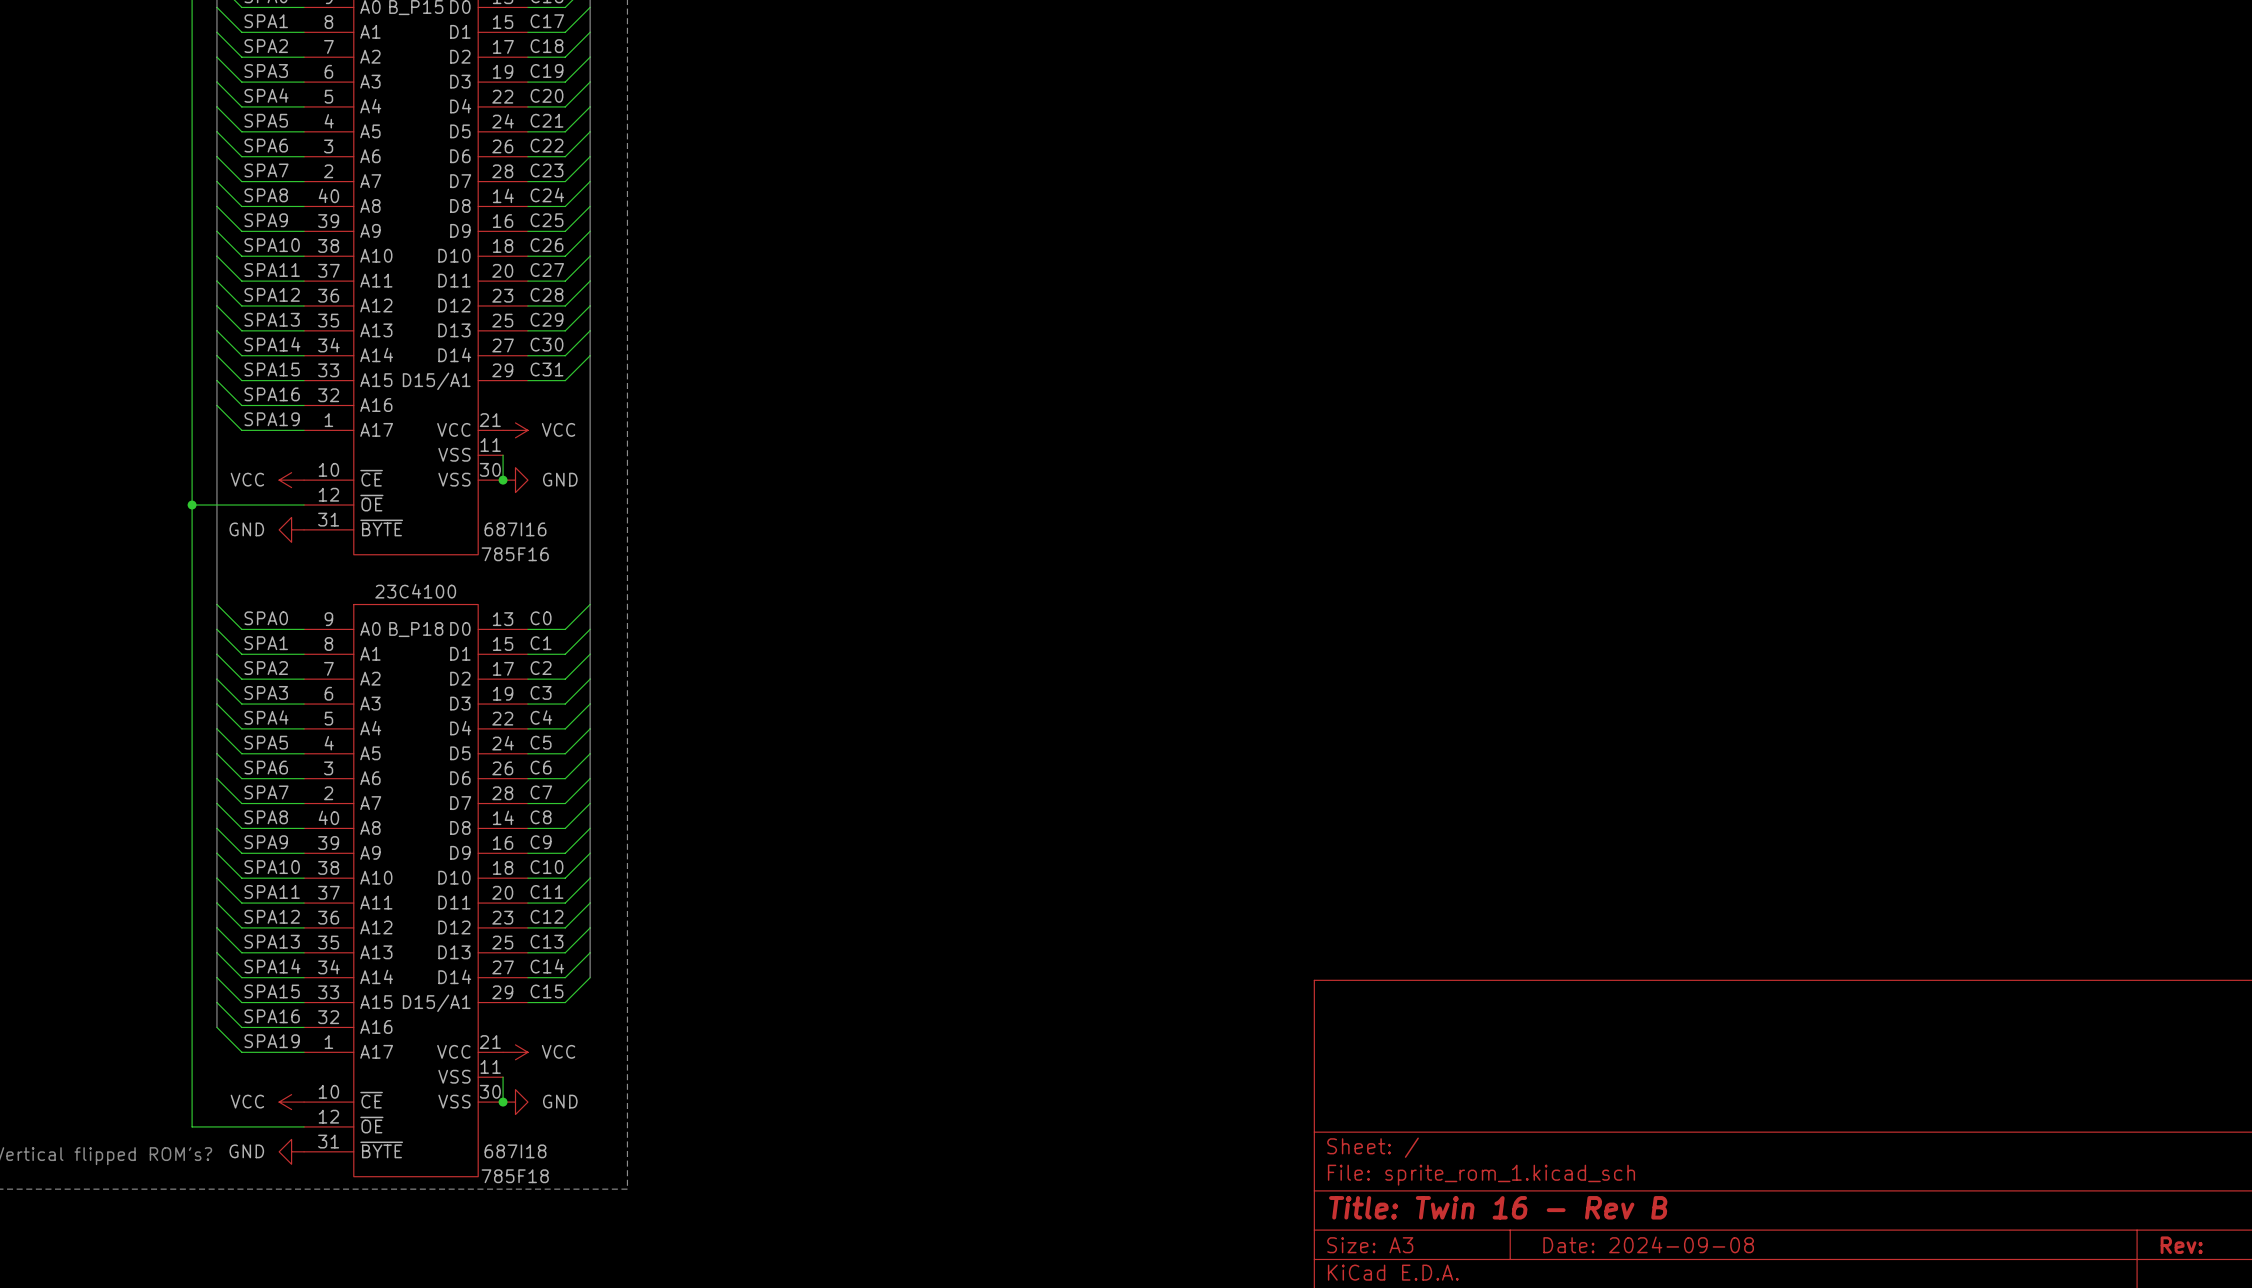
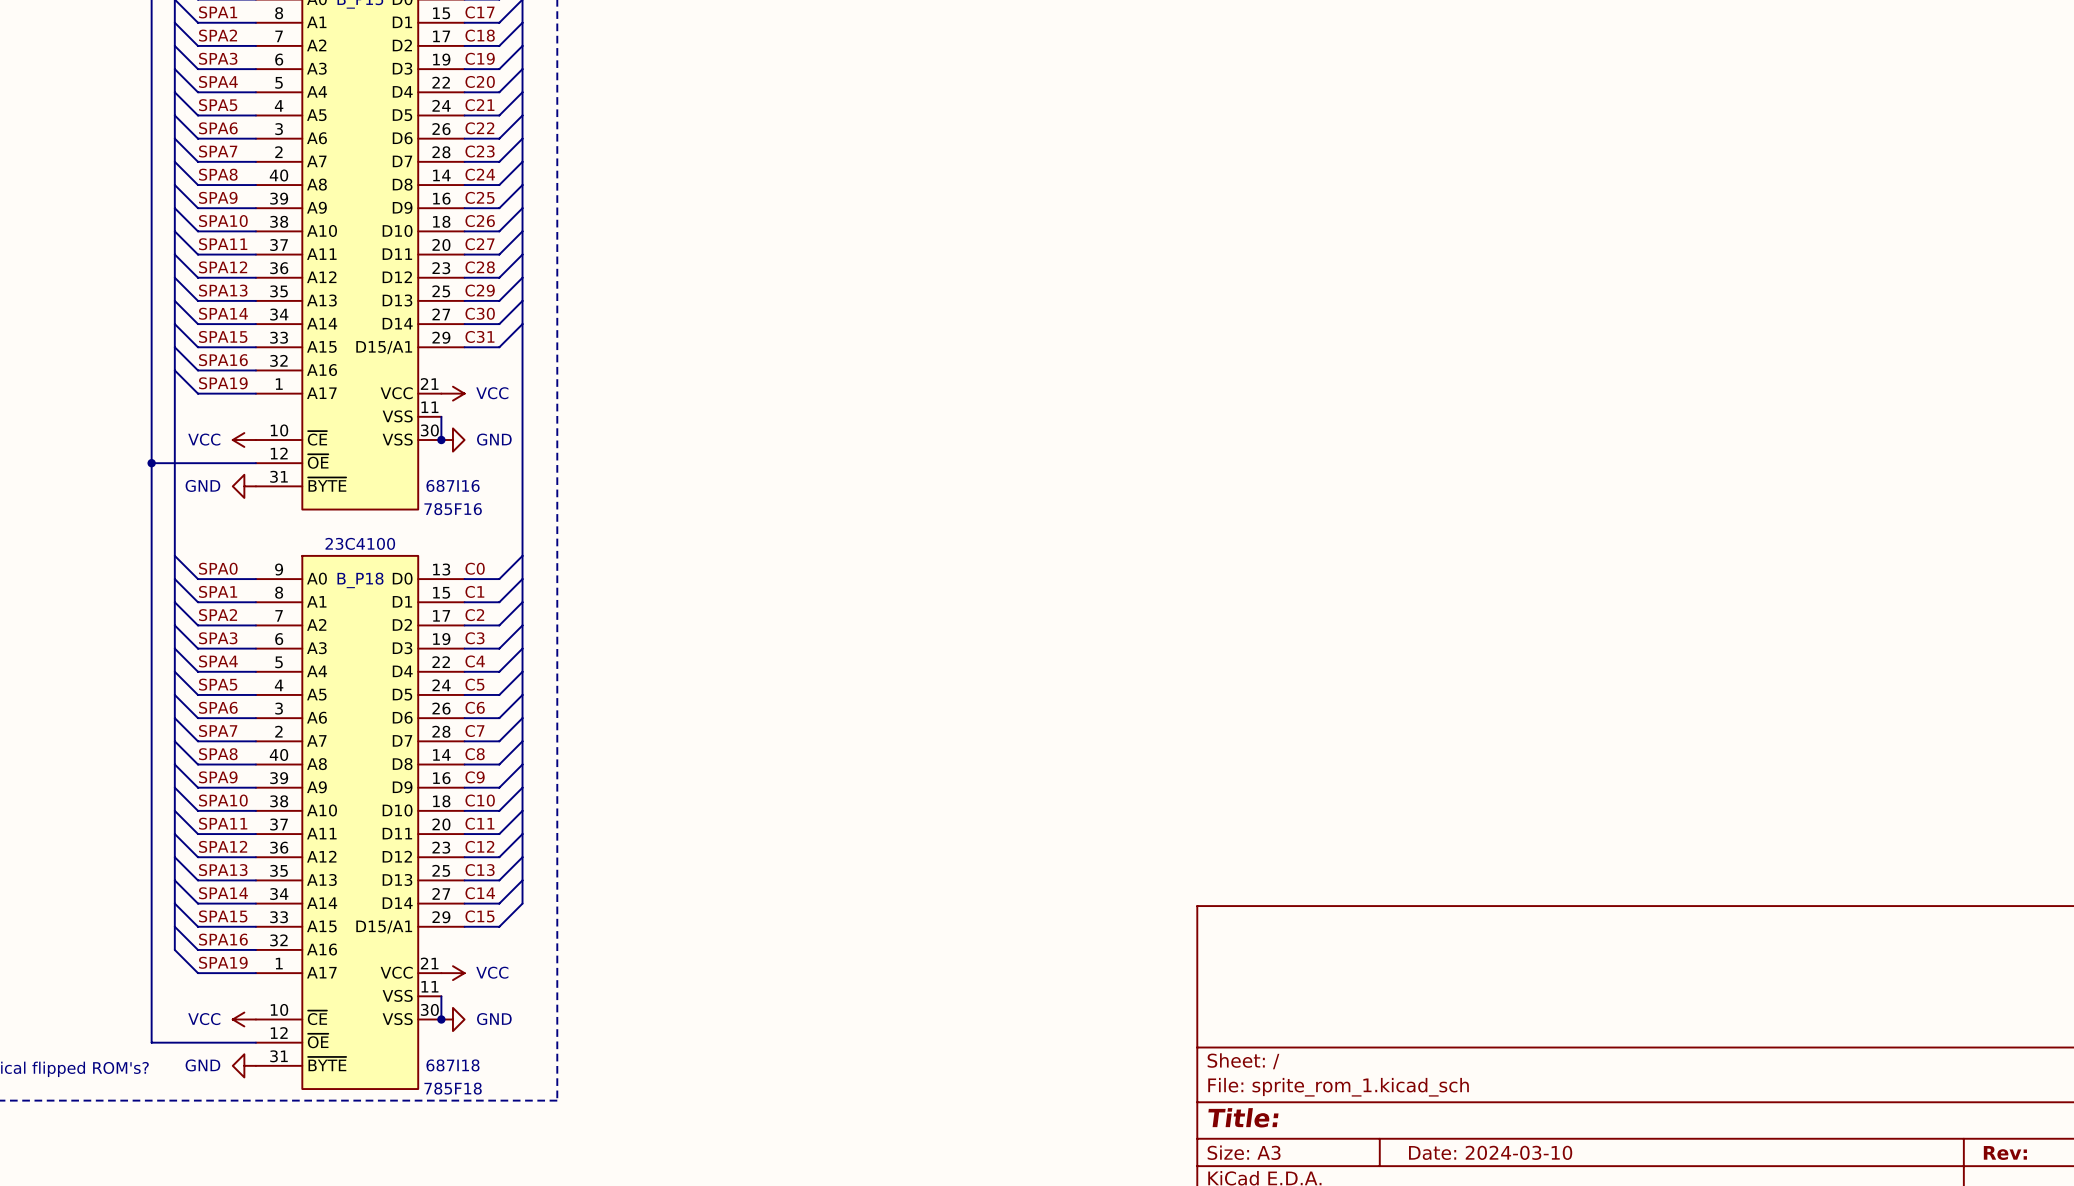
title block: Title: Twin 16 - Rev B (1498, 1207) -> Title: (1243, 1117)
title block: Date: 2024-09-08 (1648, 1244) -> Date: 2024-03-10 (1490, 1152)

